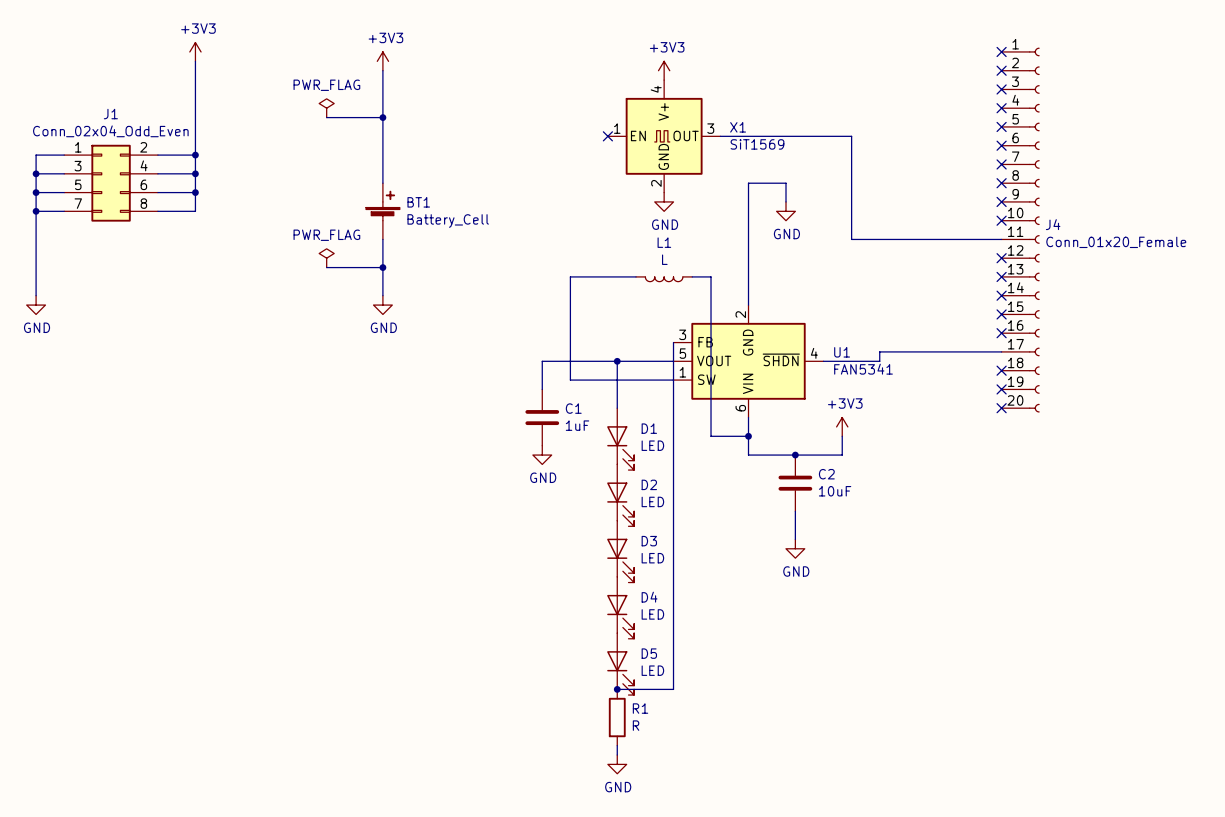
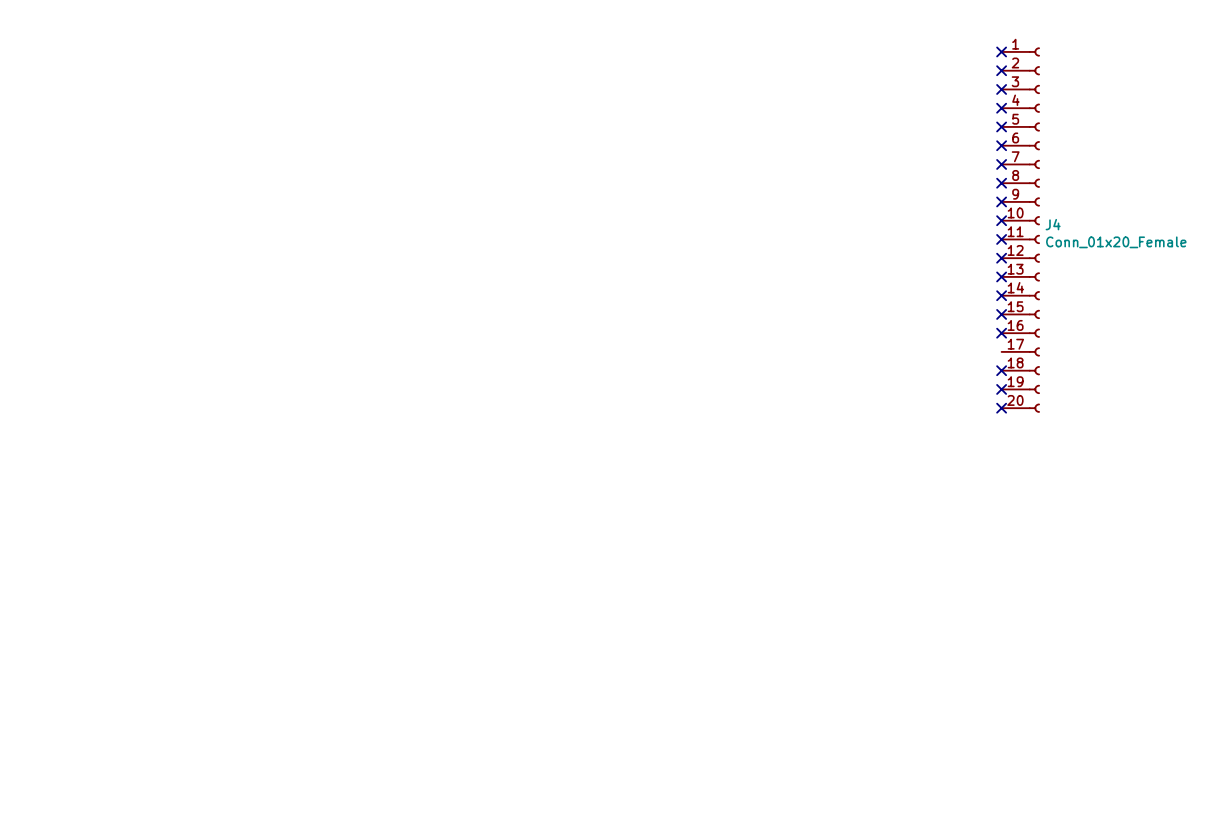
power symbol: +3V3 (195, 51) -> none
wire: (195, 61) (195, 211) (157, 211) -> none
power symbol: +3V3 (382, 61) -> none
wire: (382, 70) (382, 183) -> none
power symbol: +3V3 (664, 70) -> none
power symbol: PWR_FLAG (326, 108) -> none
wire: (326, 117) (382, 117) -> none
junction: (382, 117) -> none
no-connect mark: (607, 136) -> none
X1: SiT1569 (664, 136) -> none
wire: (720, 136) (851, 136) (851, 239) (1001, 239) -> none
wire: (64, 155) (36, 155) (36, 295) -> none
wire: (157, 155) (195, 155) -> none
junction: (195, 155) -> none
wire: (36, 173) (64, 173) -> none
junction: (36, 173) -> none
wire: (157, 173) (195, 173) -> none
junction: (195, 173) -> none
J1: Conn_02x04_Odd_Even (111, 183) -> none
wire: (36, 192) (64, 192) -> none
junction: (36, 192) -> none
wire: (157, 192) (195, 192) -> none
junction: (195, 192) -> none
power symbol: GND (664, 201) -> none
wire: (786, 201) (786, 183) (748, 183) (748, 305) -> none
wire: (36, 211) (64, 211) -> none
junction: (36, 211) -> none
BT1: Battery_Cell (382, 211) -> none
power symbol: GND (786, 211) -> none
wire: (382, 239) (382, 295) -> none
no-connect mark: none -> (1001, 239)
power symbol: PWR_FLAG (326, 258) -> none
wire: (326, 267) (382, 267) -> none
junction: (382, 267) -> none
wire: (636, 276) (570, 276) (570, 380) (673, 380) -> none
wire: (692, 276) (711, 276) (711, 436) (748, 436) -> none
L1: L (664, 279) -> none
power symbol: GND (36, 305) -> none
power symbol: GND (382, 305) -> none
wire: (673, 342) (673, 689) (617, 689) -> none
wire: (1001, 351) (879, 351) (879, 361) (823, 361) -> none
wire: (617, 361) (617, 408) -> none
junction: (617, 361) -> none
wire: (673, 361) (542, 361) (542, 389) -> none
U1: FAN5341 (748, 361) -> none
C1: 1uF (542, 417) -> none
wire: (748, 417) (748, 455) (842, 455) (842, 436) -> none
power symbol: +3V3 (842, 426) -> none
junction: (748, 436) -> none
D1: LED (620, 439) -> none
power symbol: GND (542, 455) -> none
junction: (795, 455) -> none
C2: 10uF (795, 483) -> none
D2: LED (620, 495) -> none
wire: (795, 511) (795, 539) -> none
power symbol: GND (795, 548) -> none
D3: LED (620, 551) -> none
D4: LED (620, 607) -> none
D5: LED (620, 664) -> none
junction: (617, 689) -> none
R1: R (617, 717) -> none
wire: (617, 745) (617, 755) -> none
power symbol: GND (617, 764) -> none

